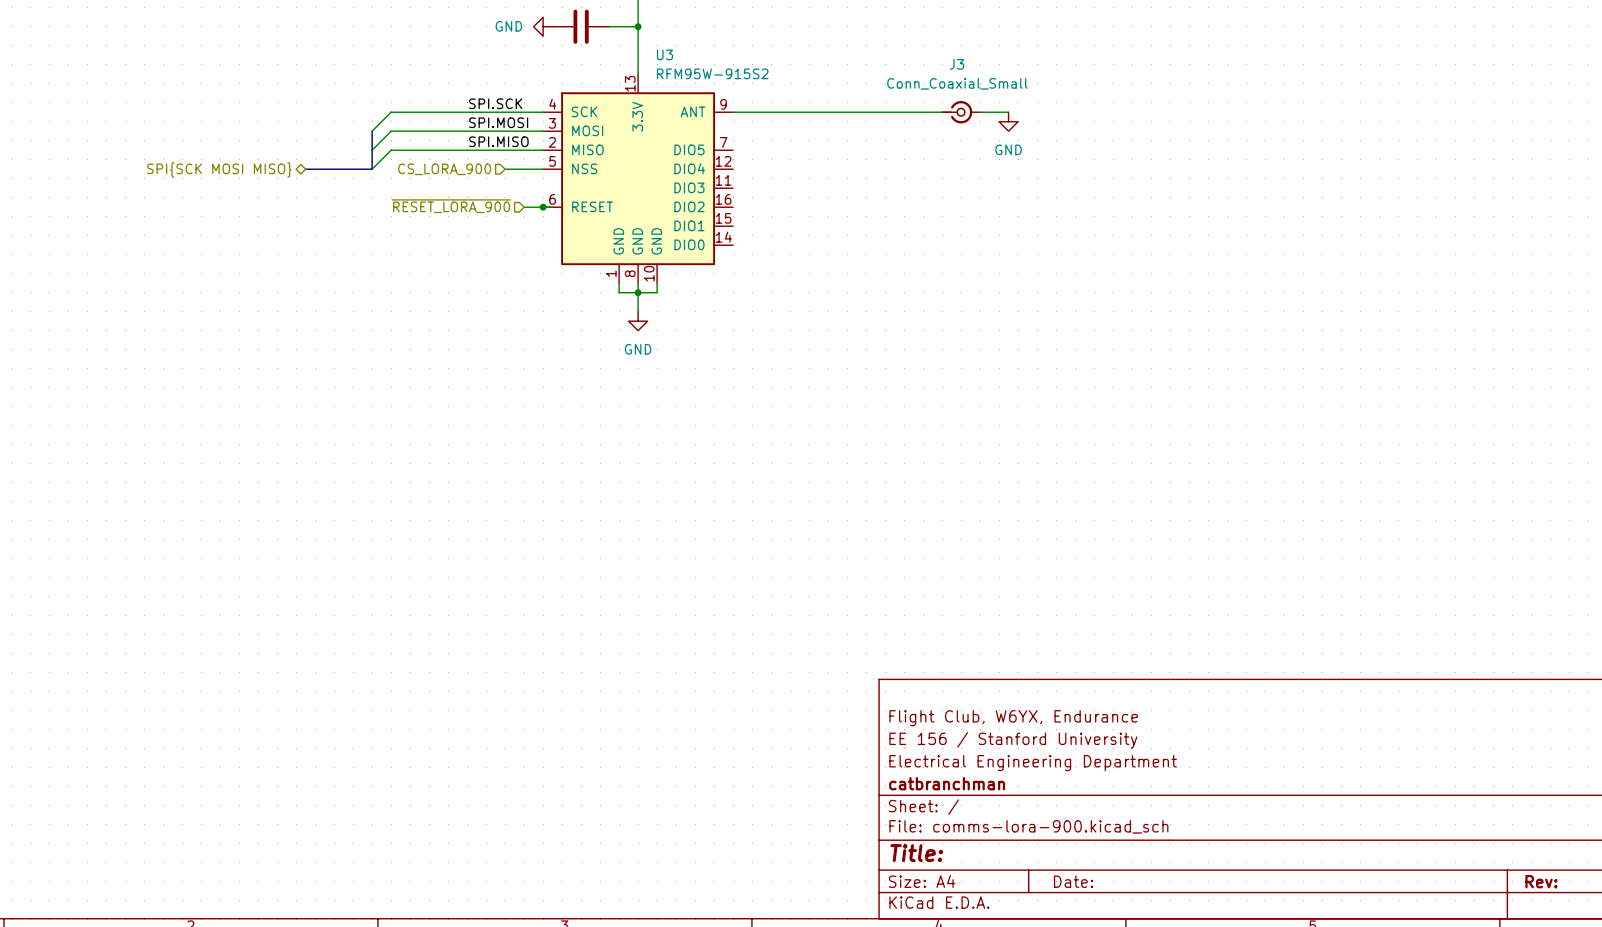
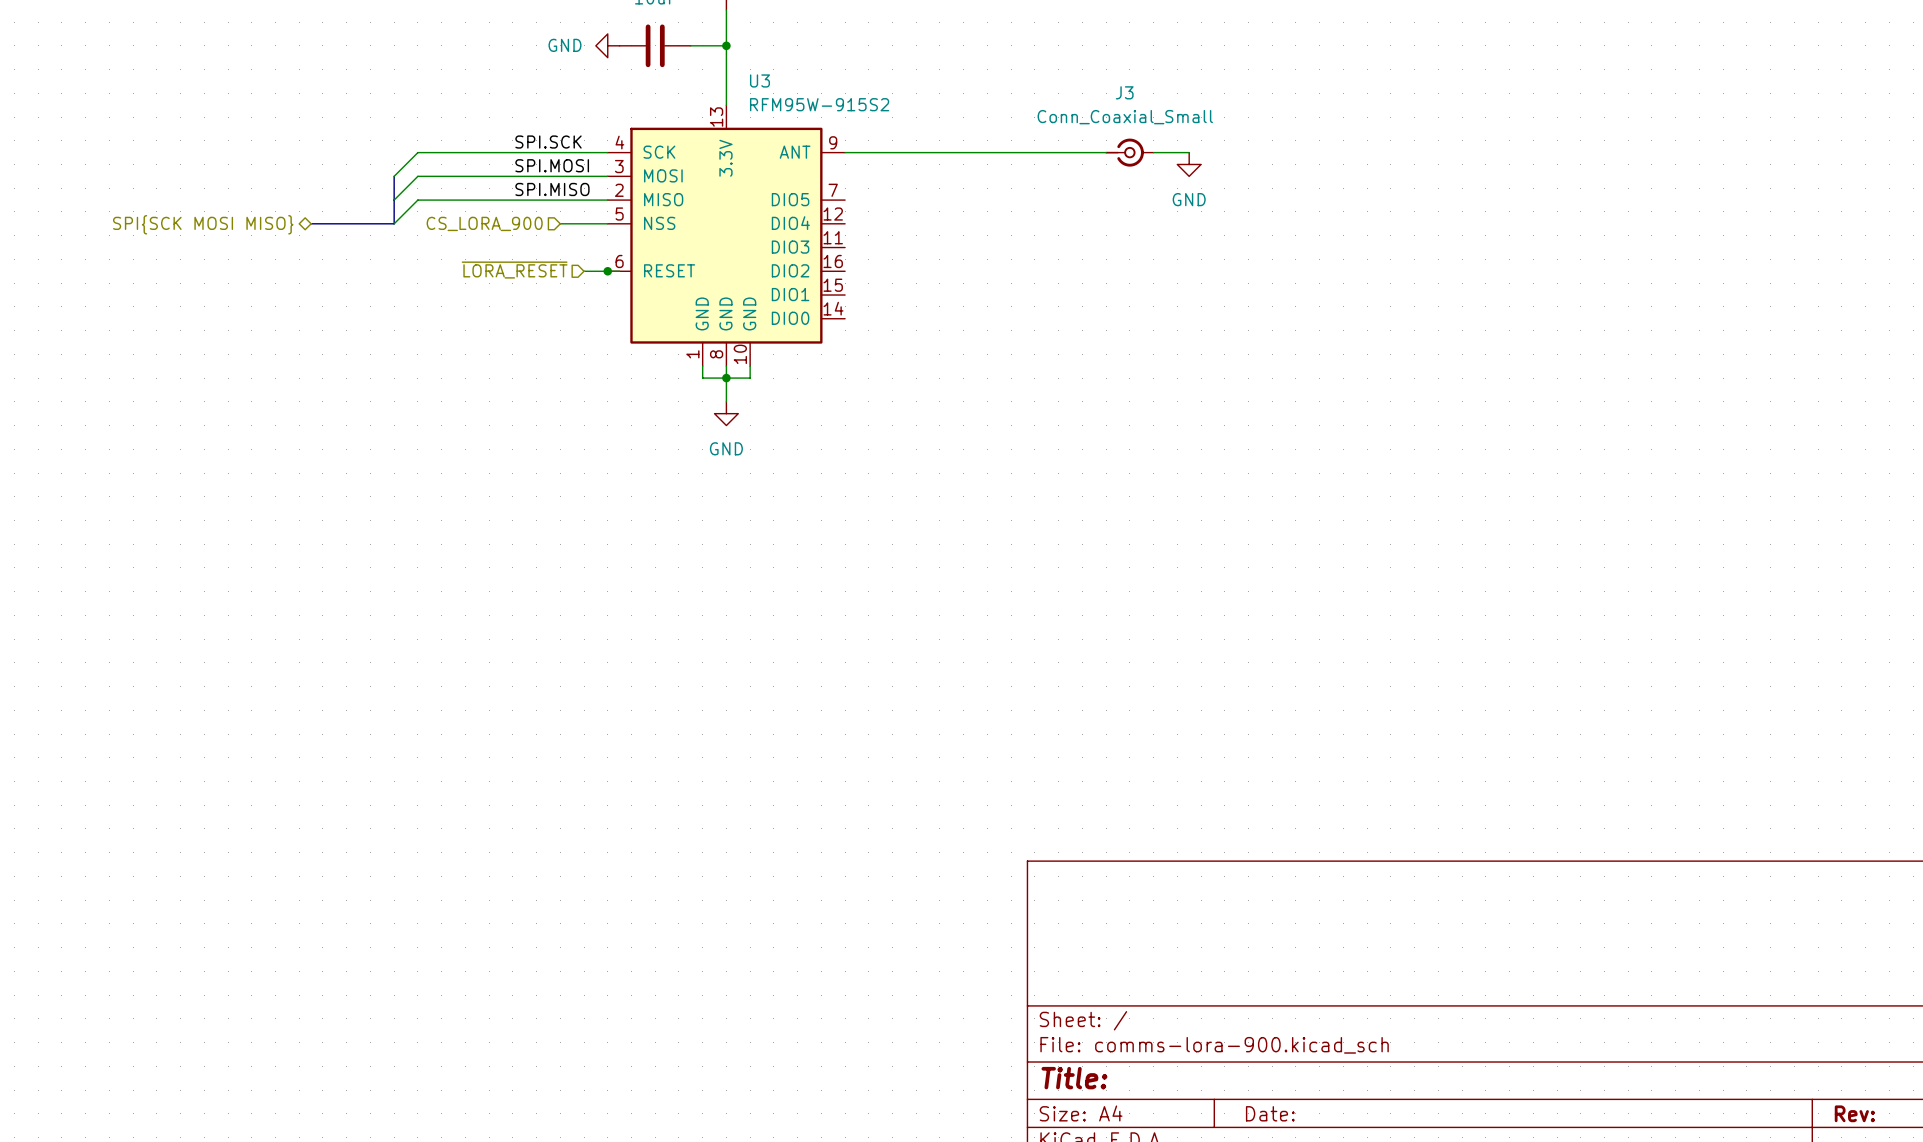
hierarchical label: ~{RESET_LORA_900} (451, 206) -> ~{LORA_RESET} (514, 270)
title block: Flight Club, W6YX, Endurance (1013, 718) -> none
title block: EE 156 / Stanford University (1013, 740) -> none
title block: Electrical Engineering Department (1033, 763) -> none
title block: catbranchman (947, 783) -> none

